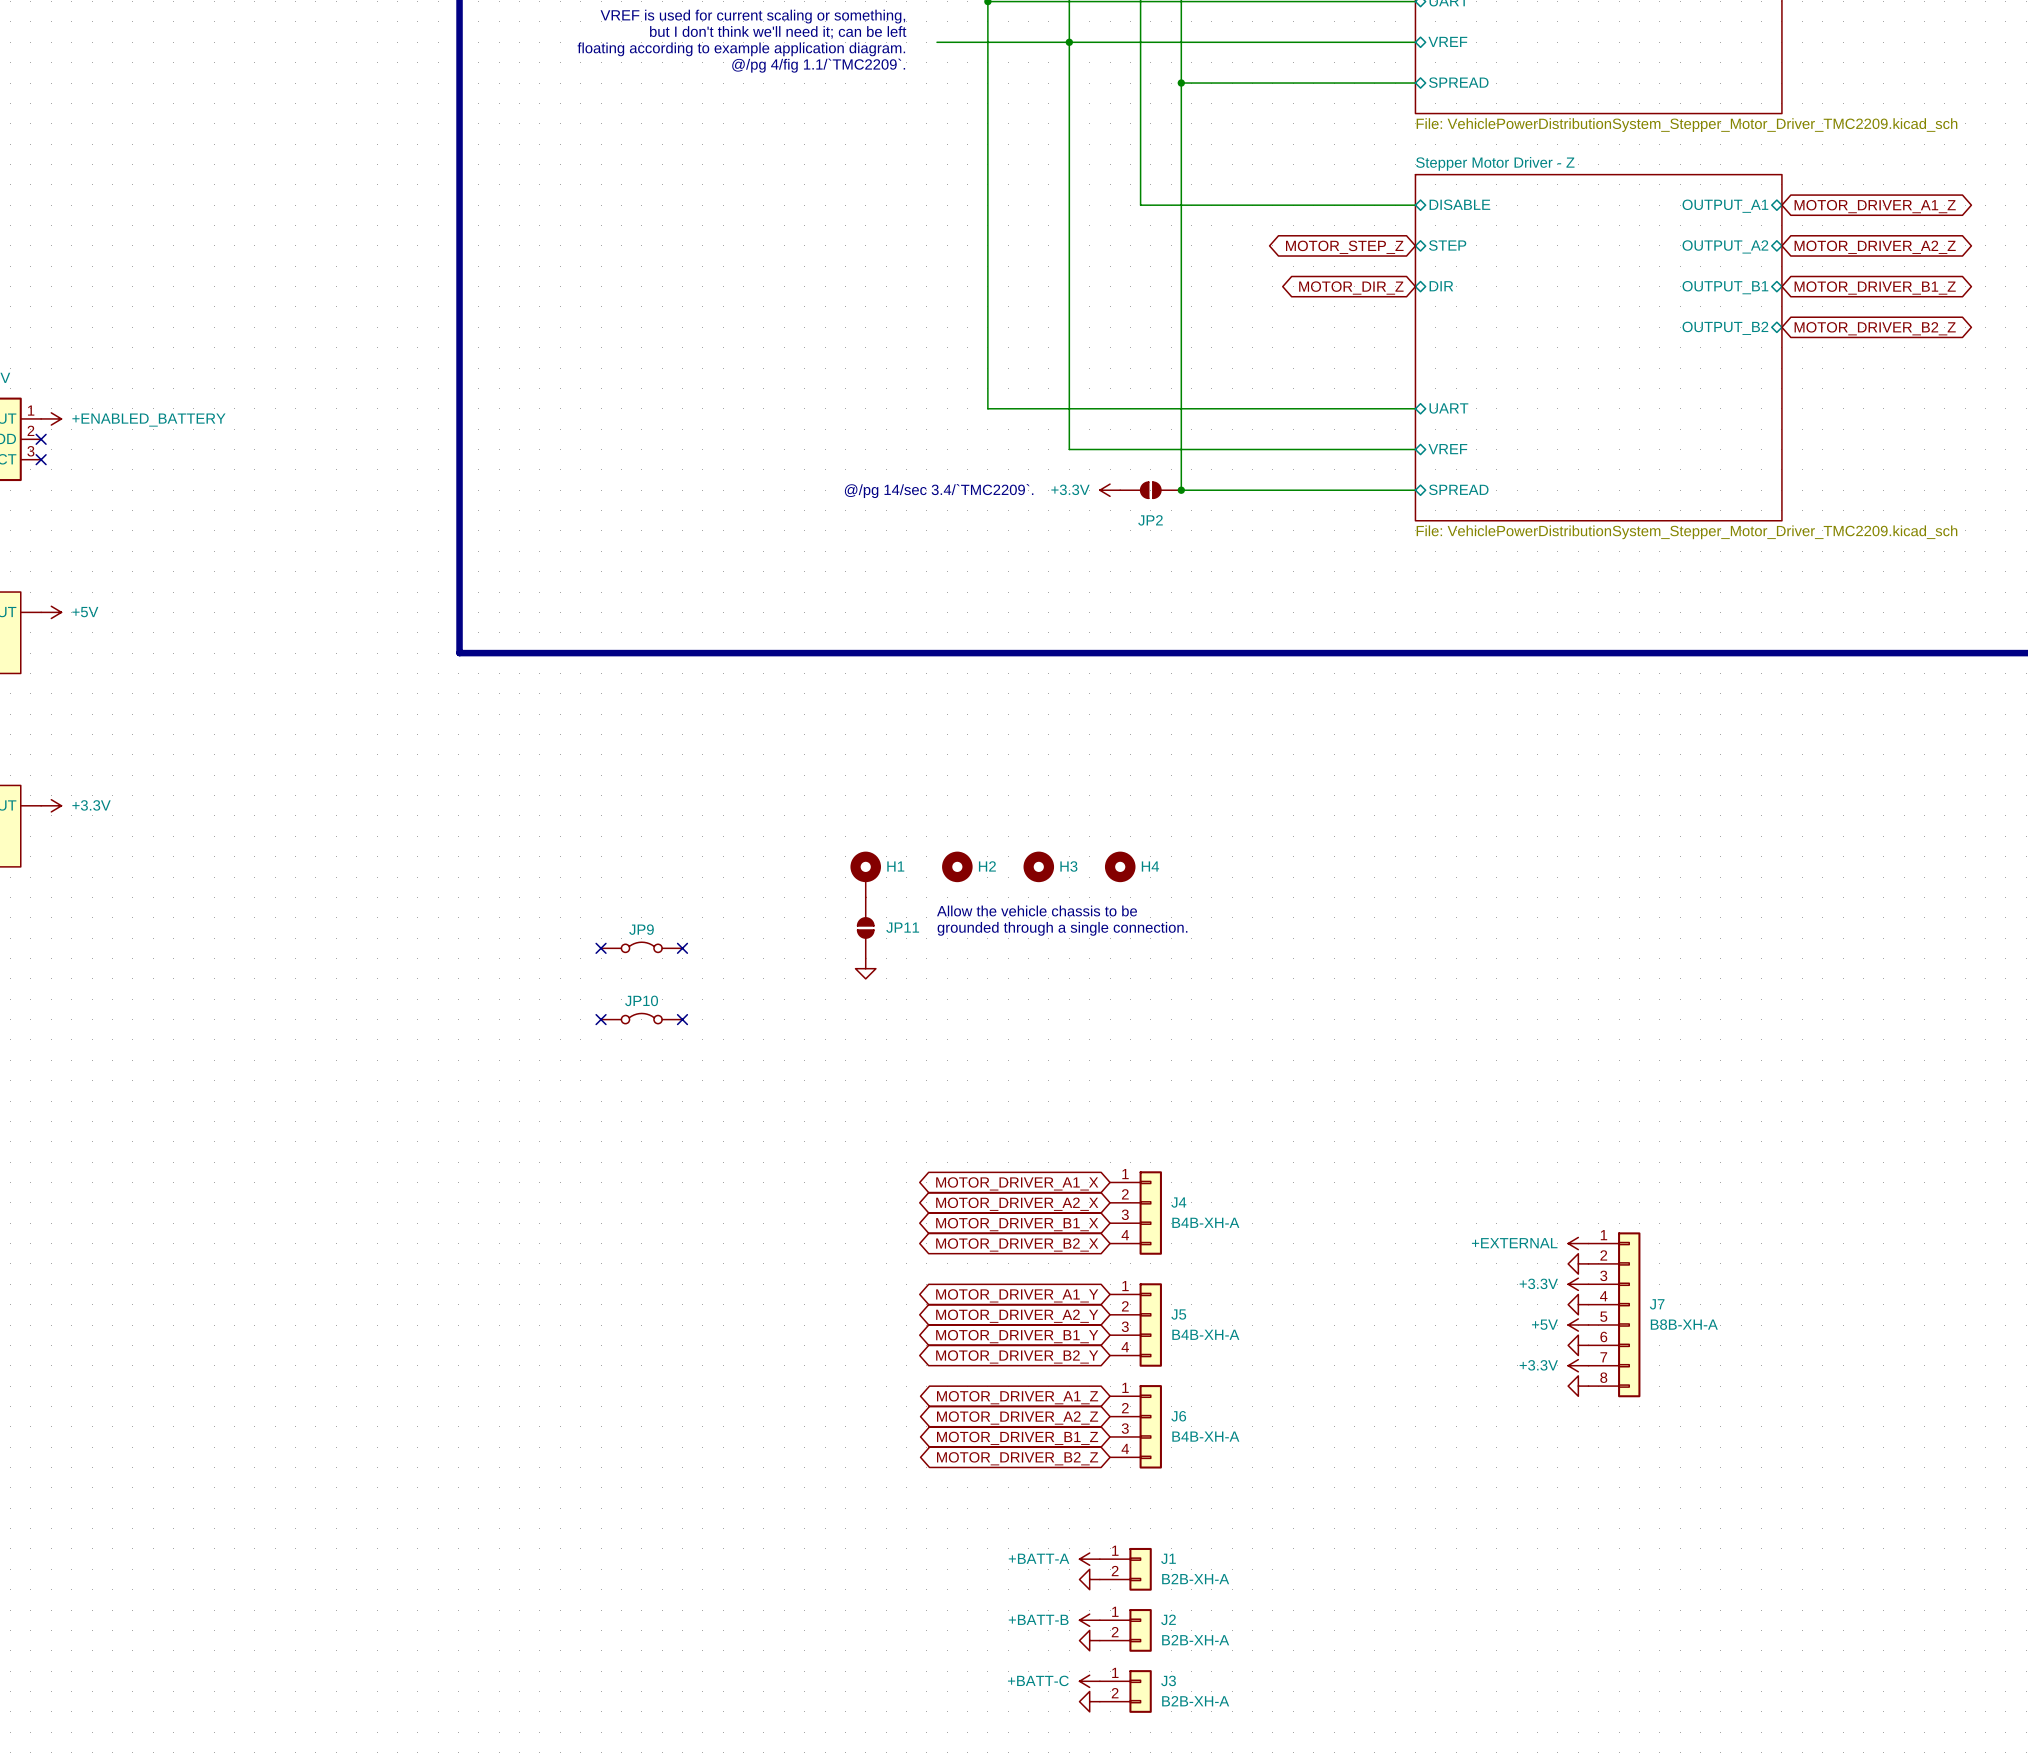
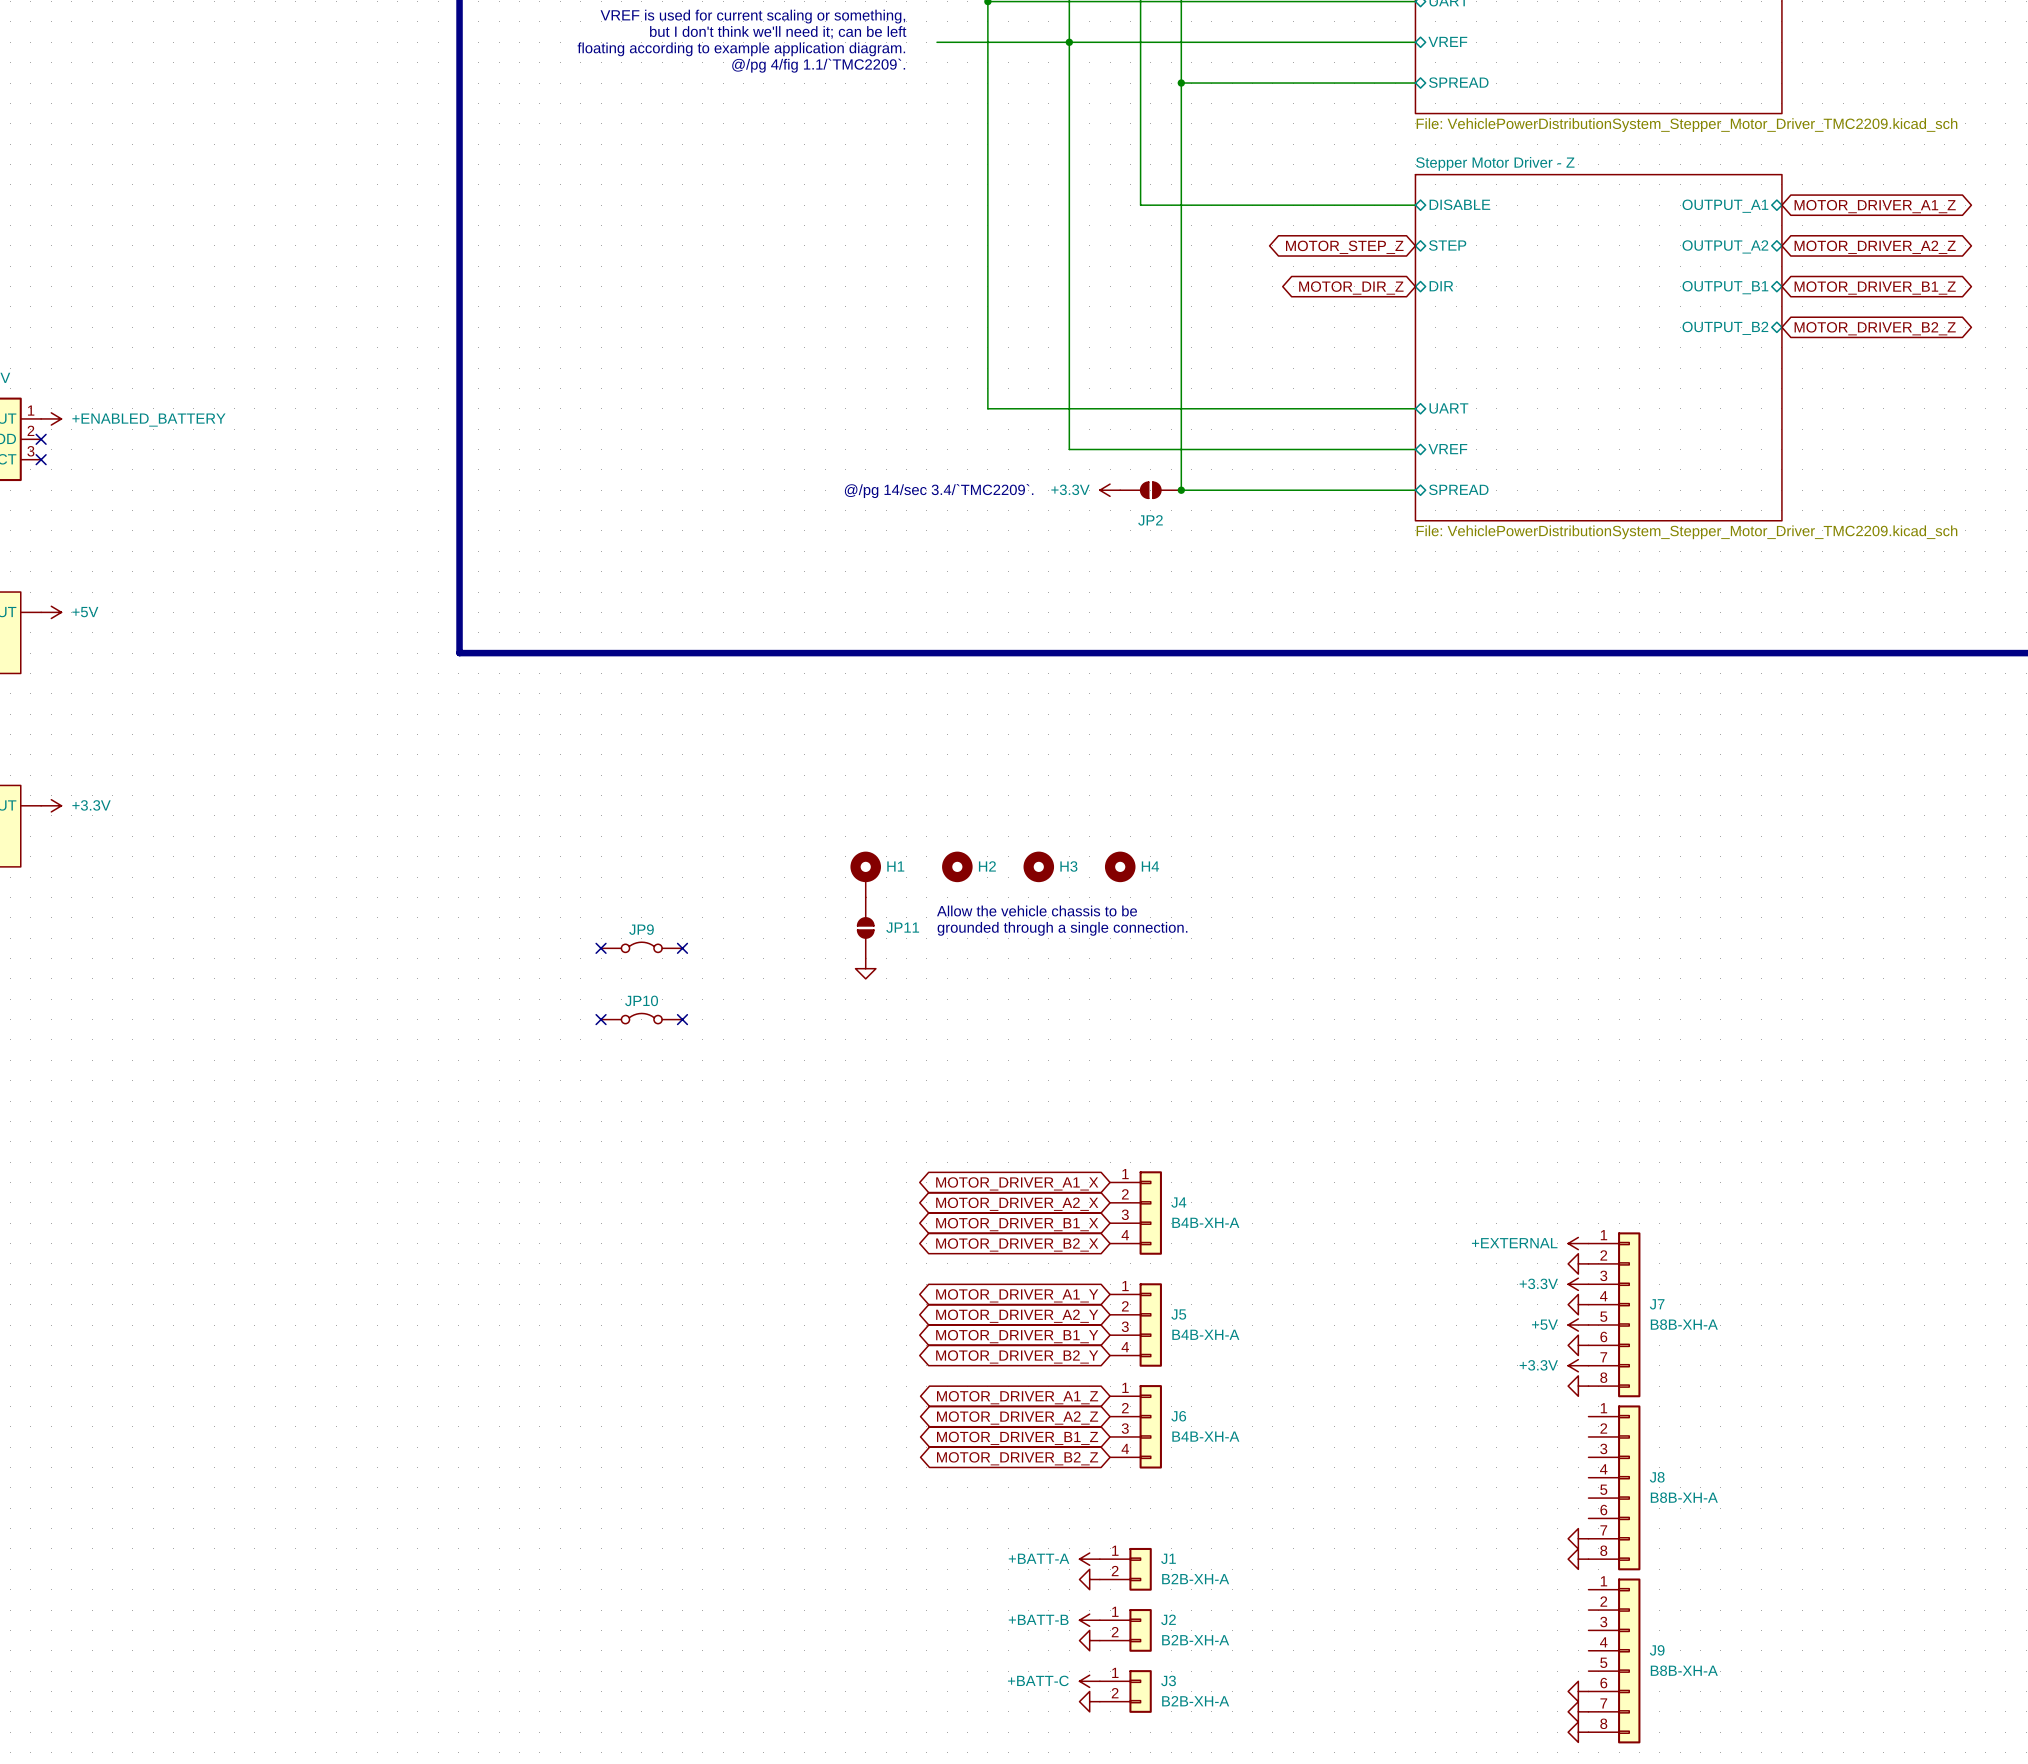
J8: none -> B8B-XH-A (1614, 1487)
power symbol: none -> (1578, 1538)
power symbol: none -> (1578, 1559)
J9: none -> B8B-XH-A (1614, 1660)
power symbol: none -> (1578, 1691)
power symbol: none -> (1578, 1711)
power symbol: none -> (1578, 1732)

